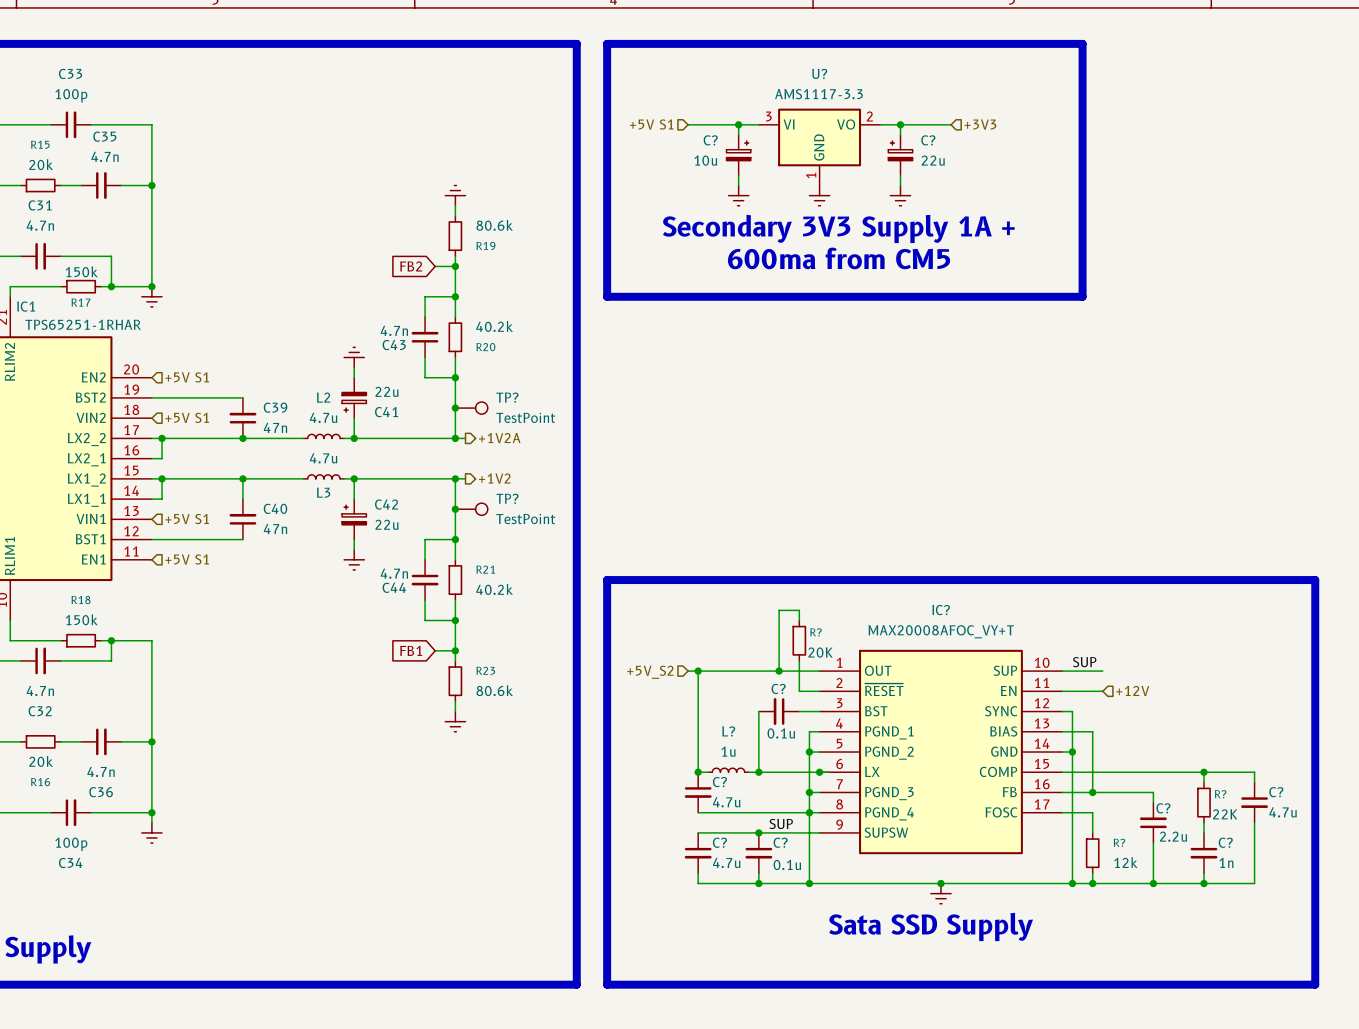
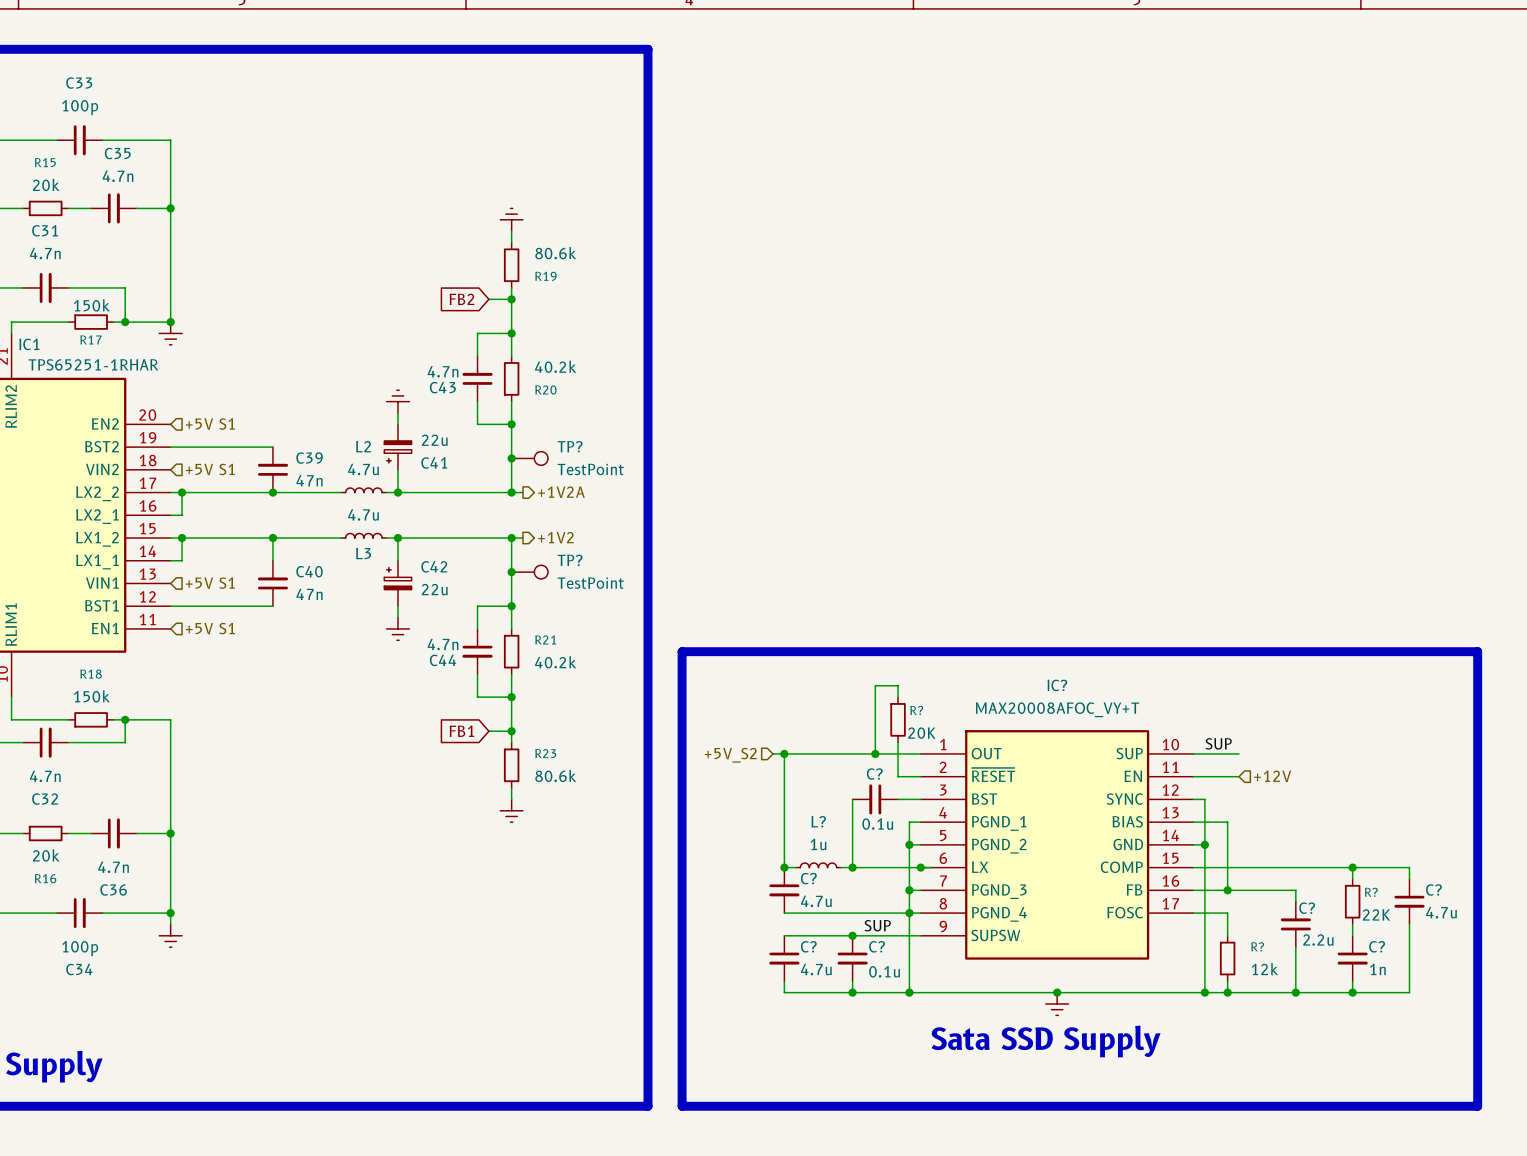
line: (607, 43) (1082, 43) (1082, 296) (607, 296) (607, 43) -> none
hierarchical label: +5V S1 (651, 124) -> none
wire: (688, 124) (758, 124) -> none
wire: (738, 124) (738, 134) -> none
junction: (738, 124) -> none
wire: (880, 124) (951, 124) -> none
wire: (900, 124) (900, 134) -> none
junction: (900, 124) -> none
hierarchical label: +3V3 (980, 124) -> none
U?: AMS1117-3.3 (819, 147) -> none
C?: 10u (738, 155) -> none
C?: 22u (900, 155) -> none
wire: (738, 175) (738, 185) -> none
wire: (900, 175) (900, 185) -> none
power symbol: (738, 195) -> none
power symbol: (819, 195) -> none
power symbol: (900, 195) -> none
text: Secondary 3V3 Supply 1A + (838, 228) -> none
text: 600ma from CM5 (839, 258) -> none

